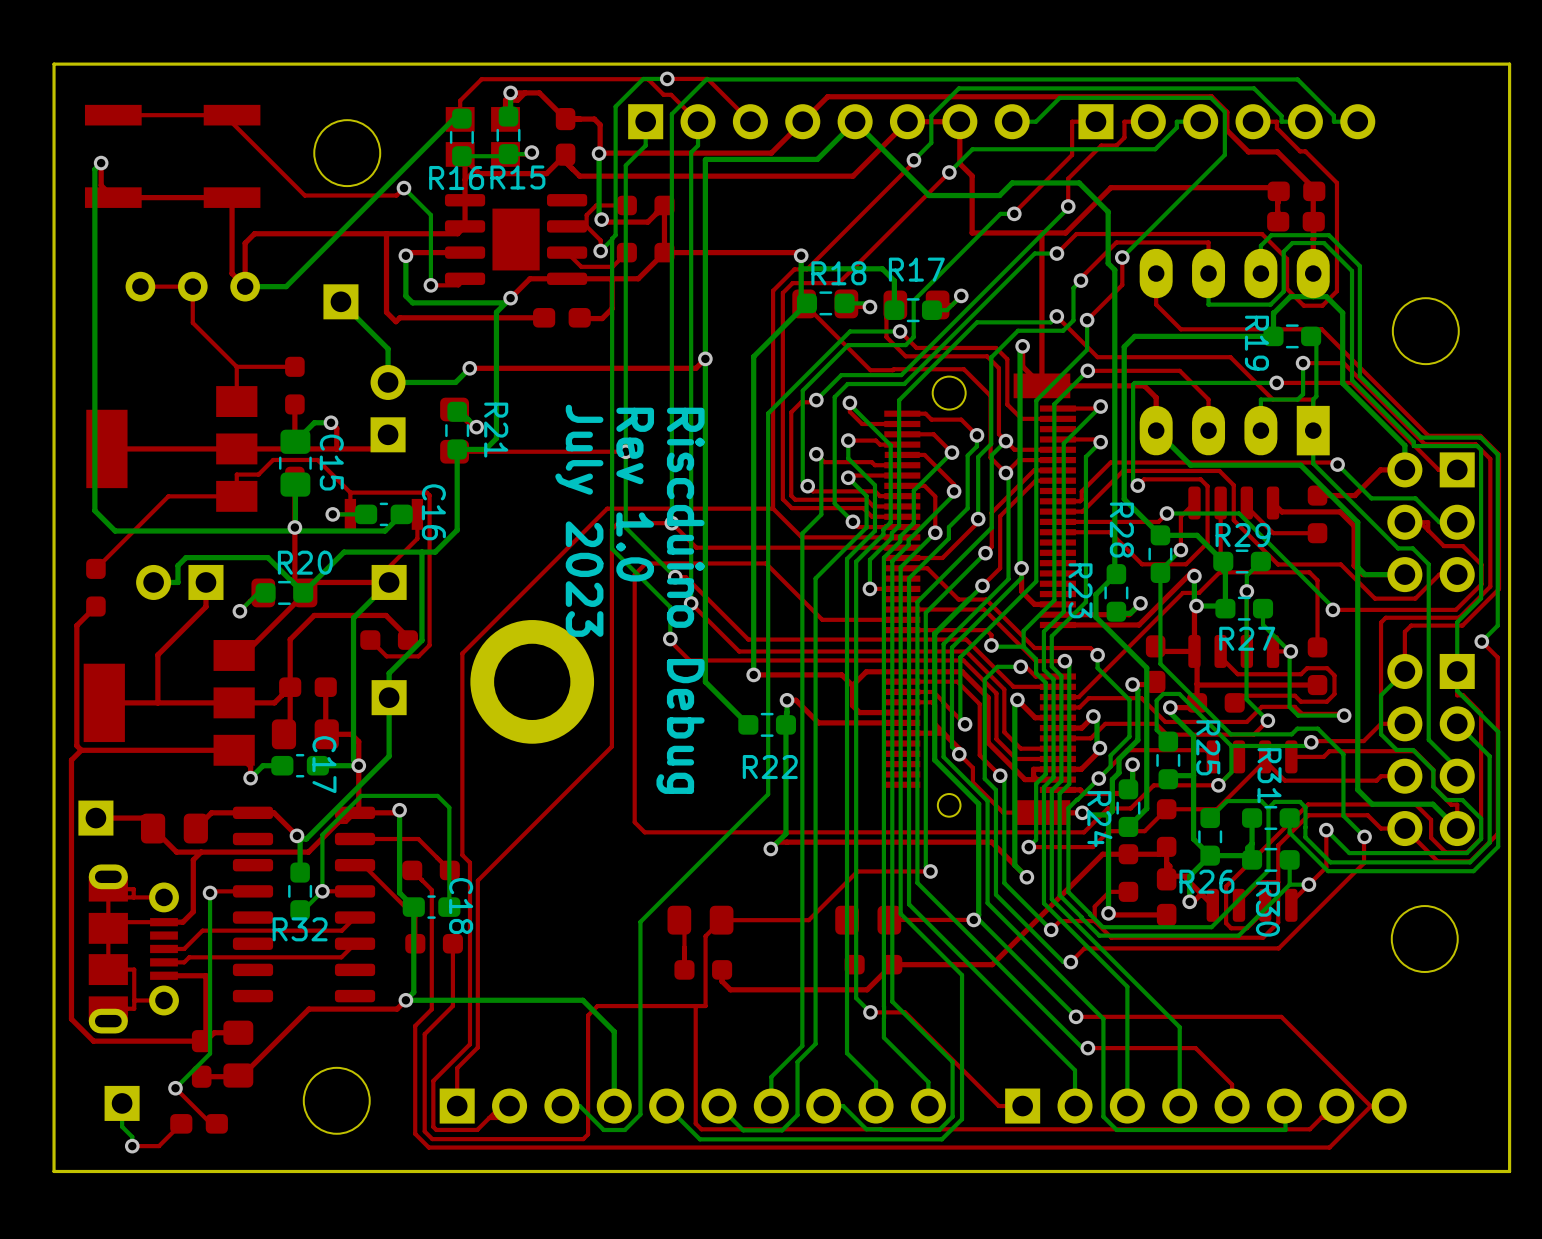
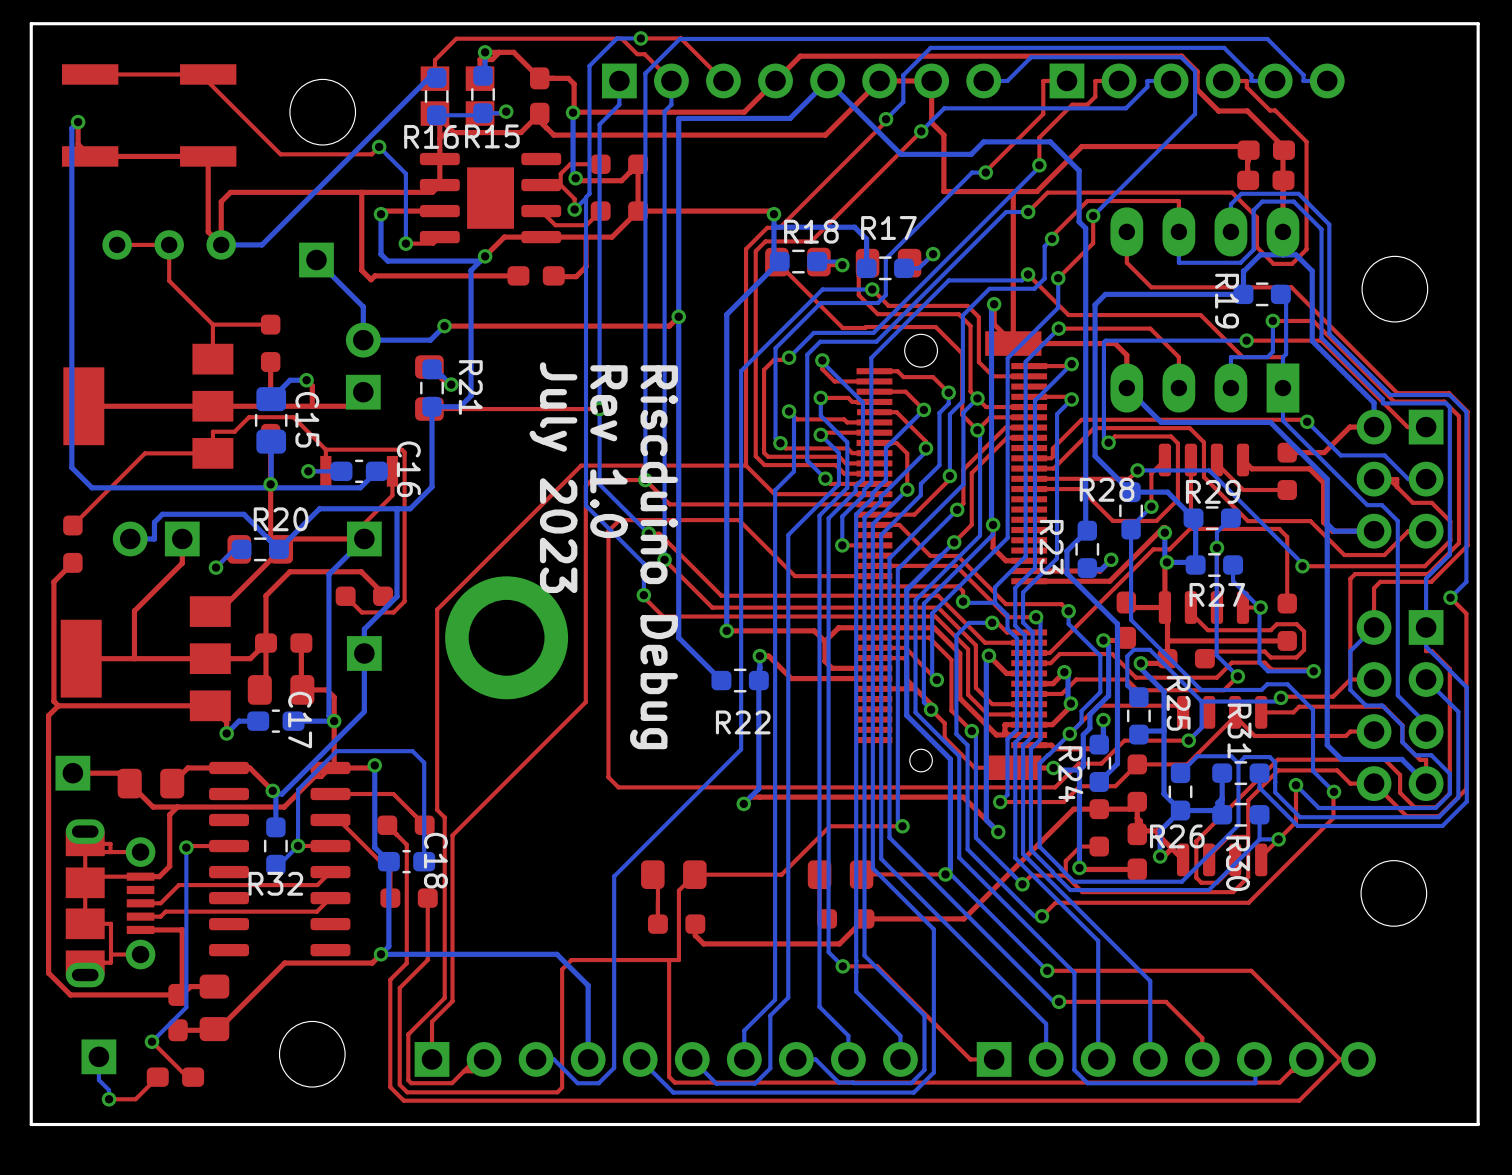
R28 name rotation: 0° (1121, 530) -> 90° counterclockwise (1107, 489)

